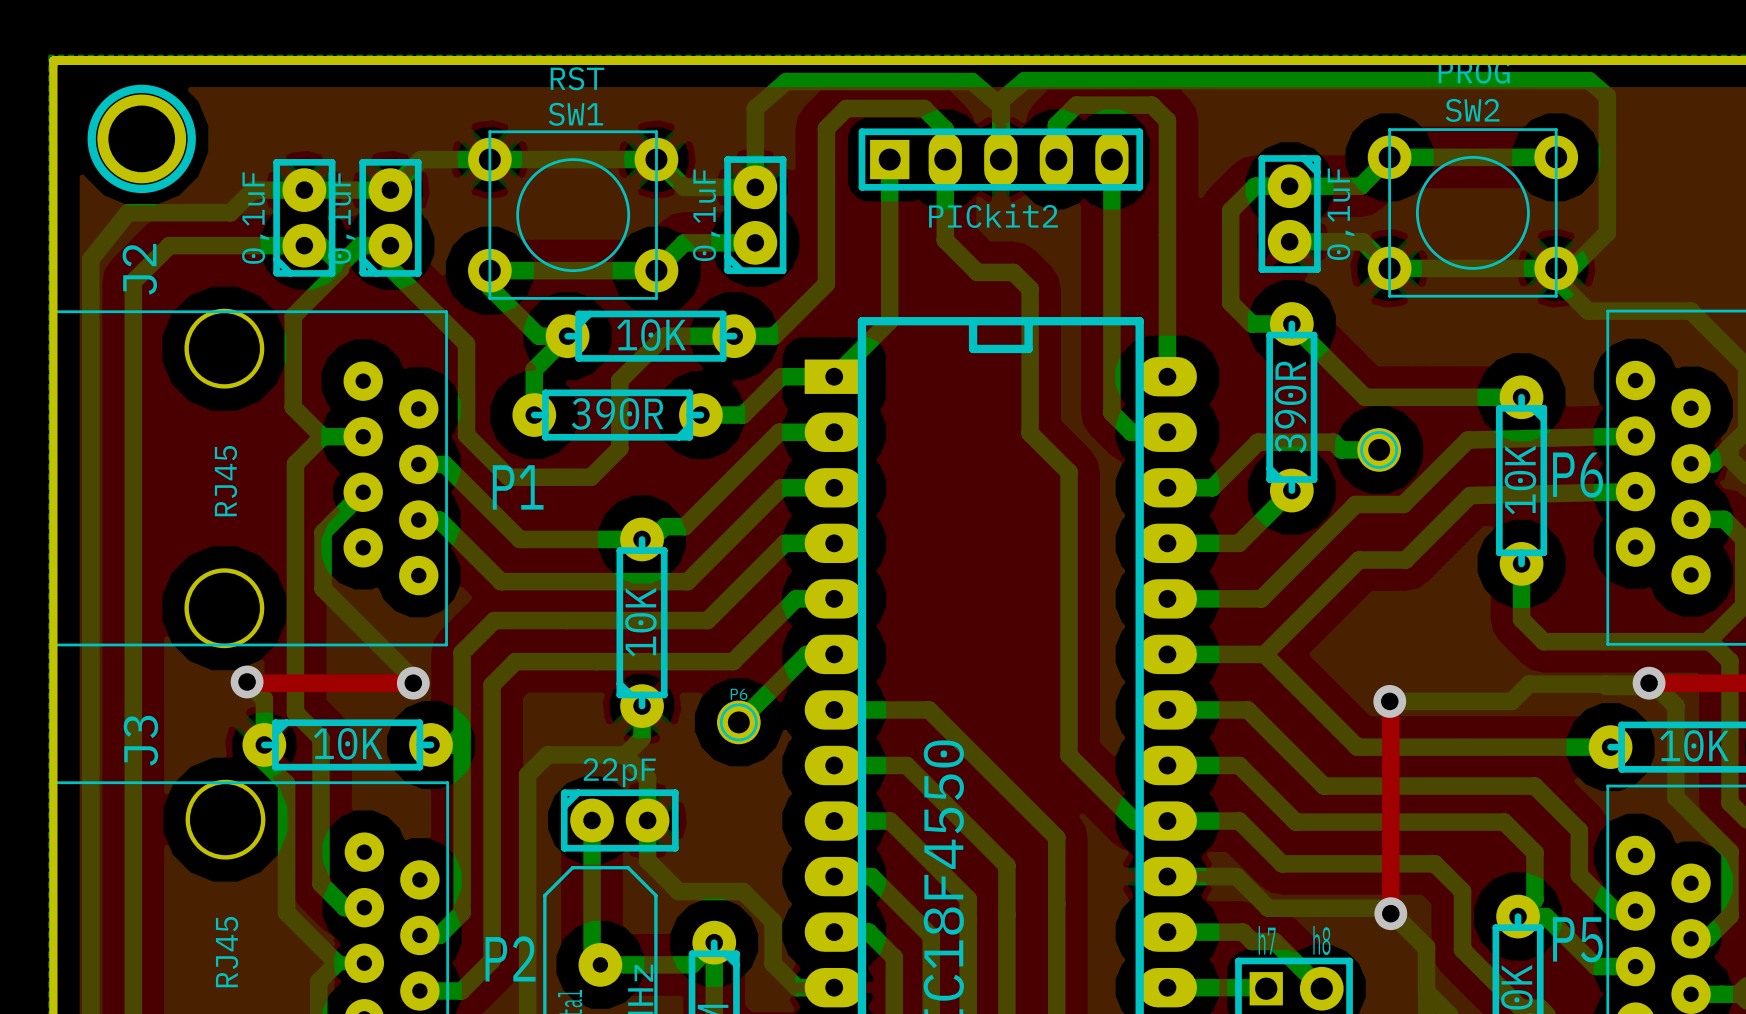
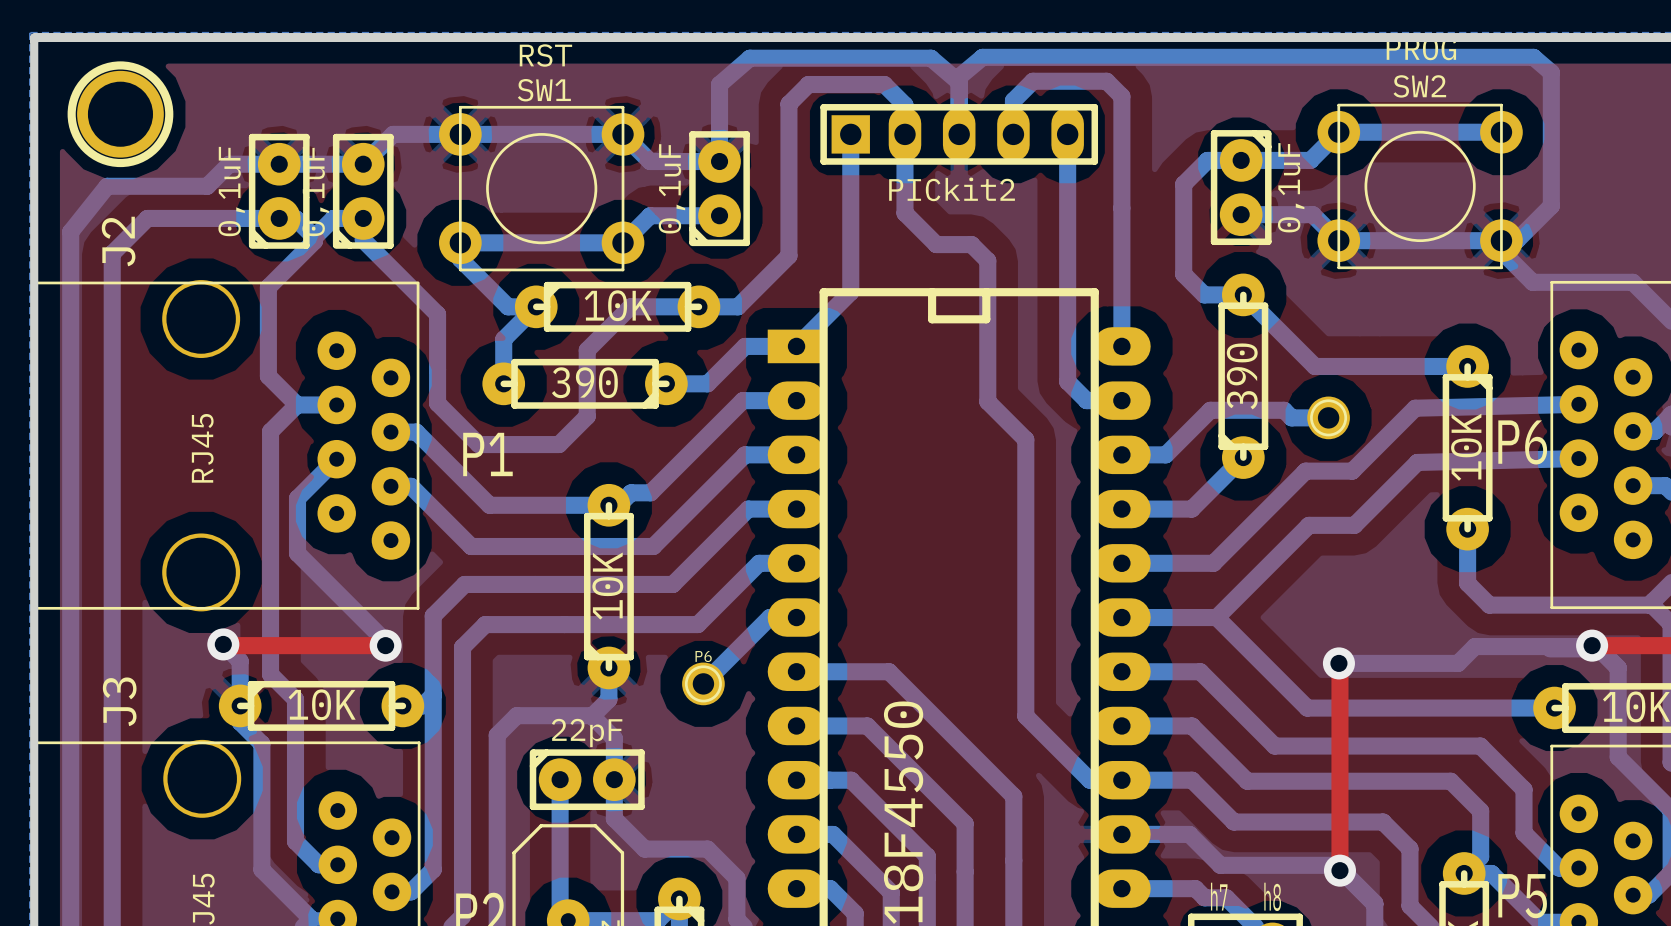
part value: 390R (1290, 407) -> 390 (1242, 376)
part value: 390R (617, 413) -> 390 (584, 382)

